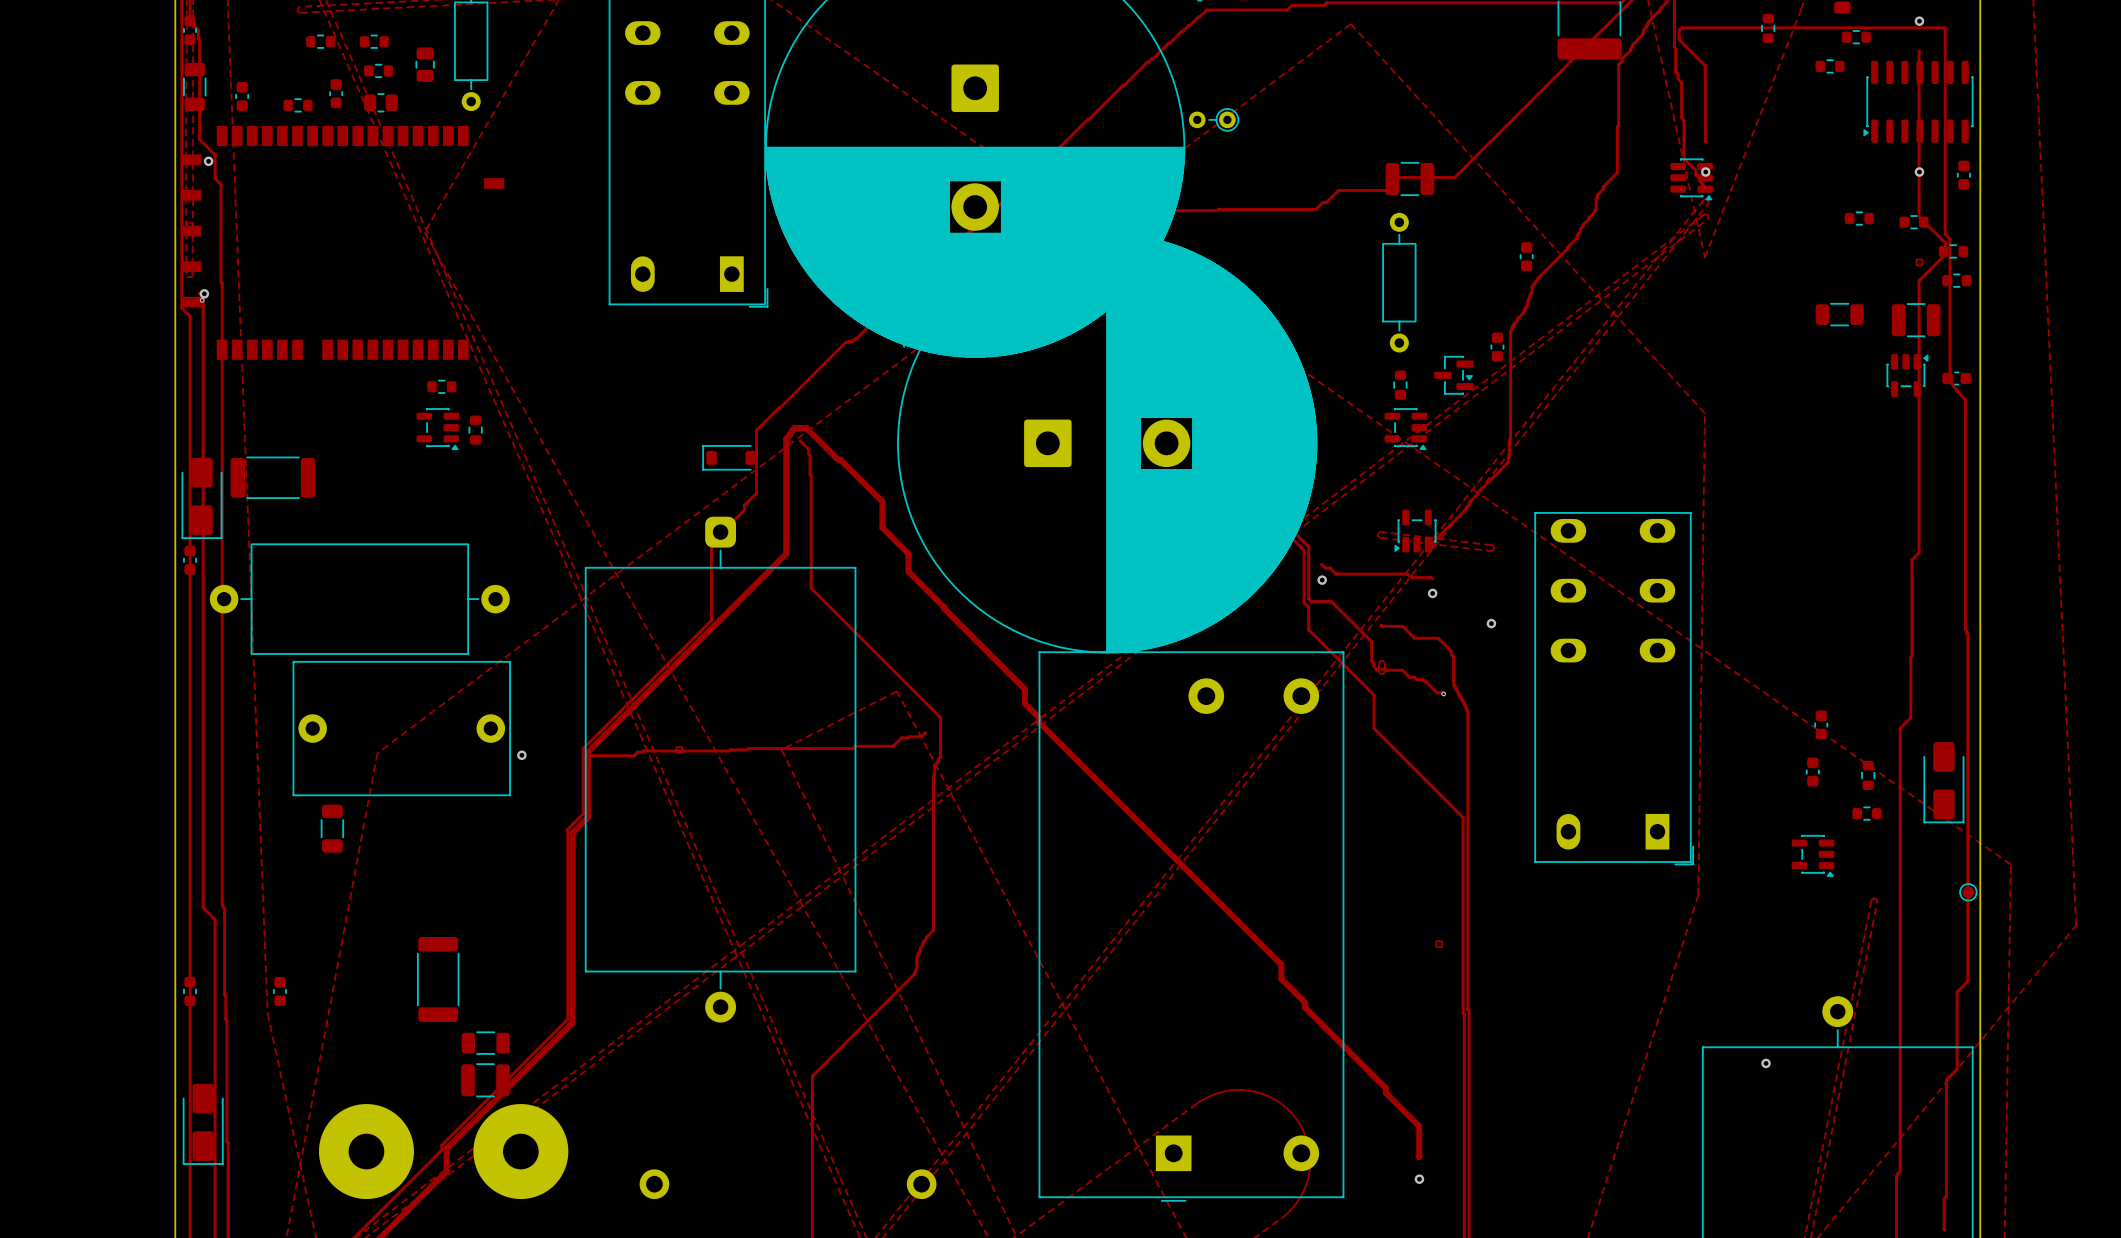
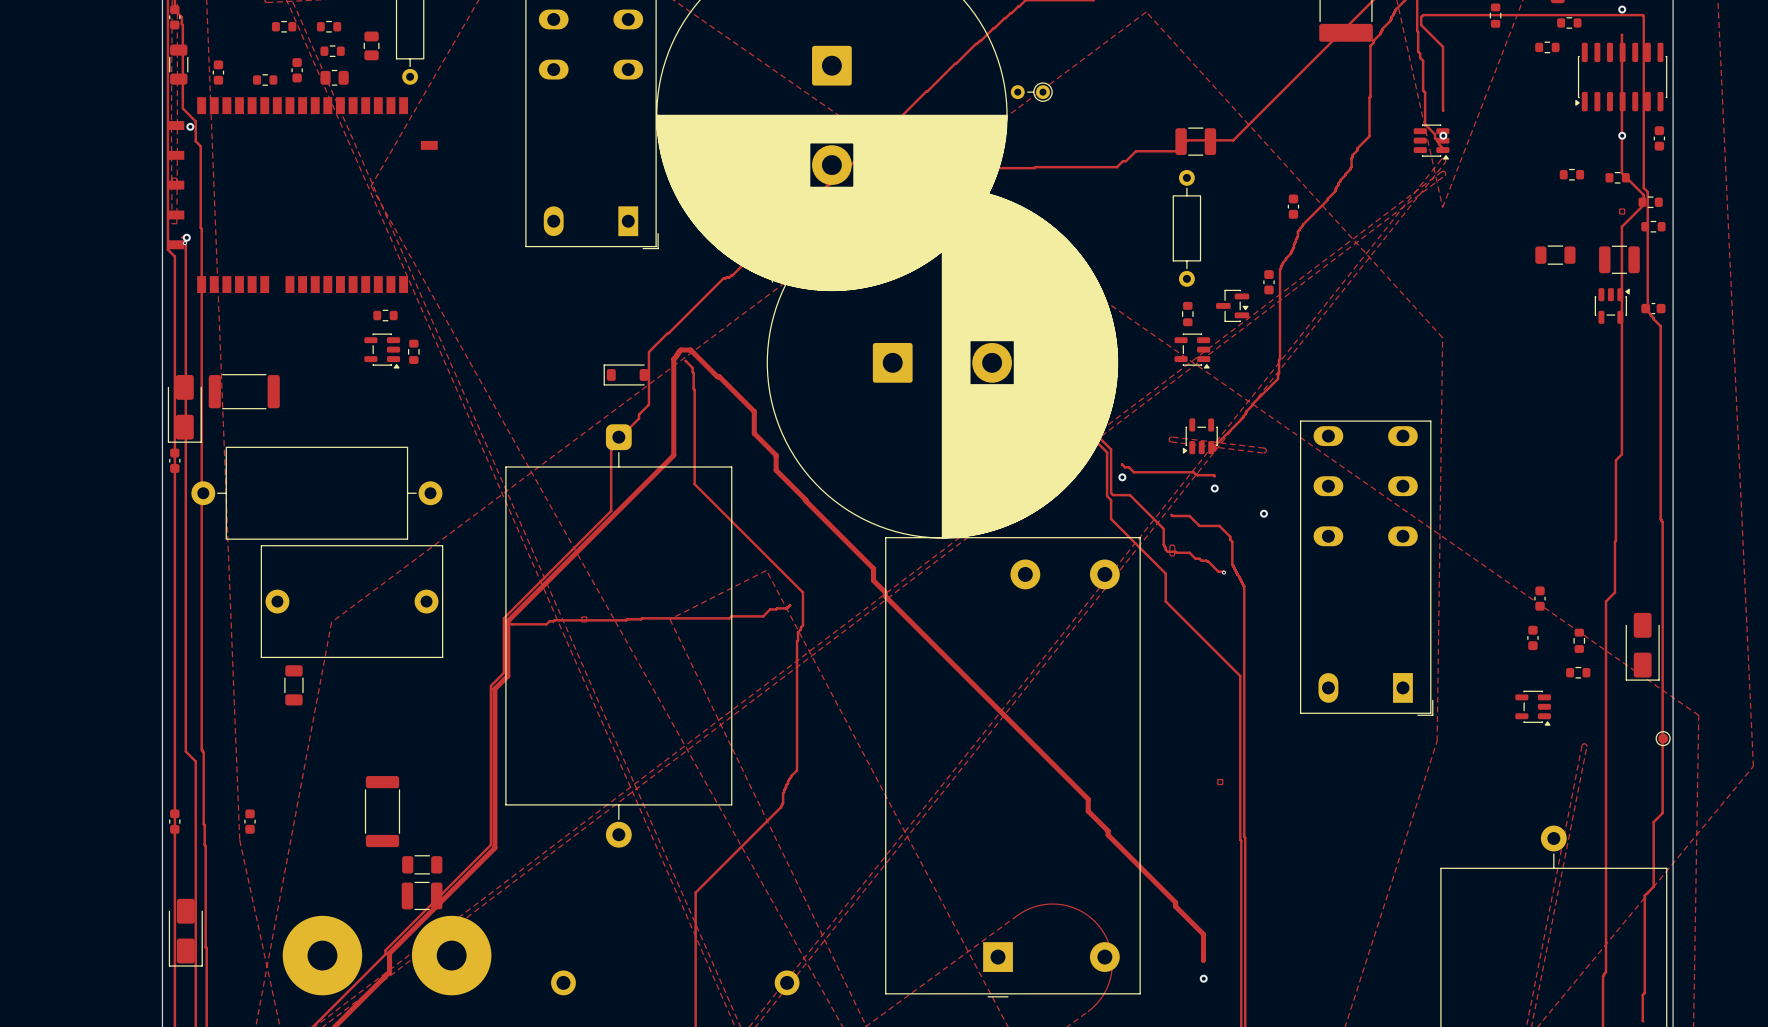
via: (521, 755) -> none
via: (1766, 1063) -> none

